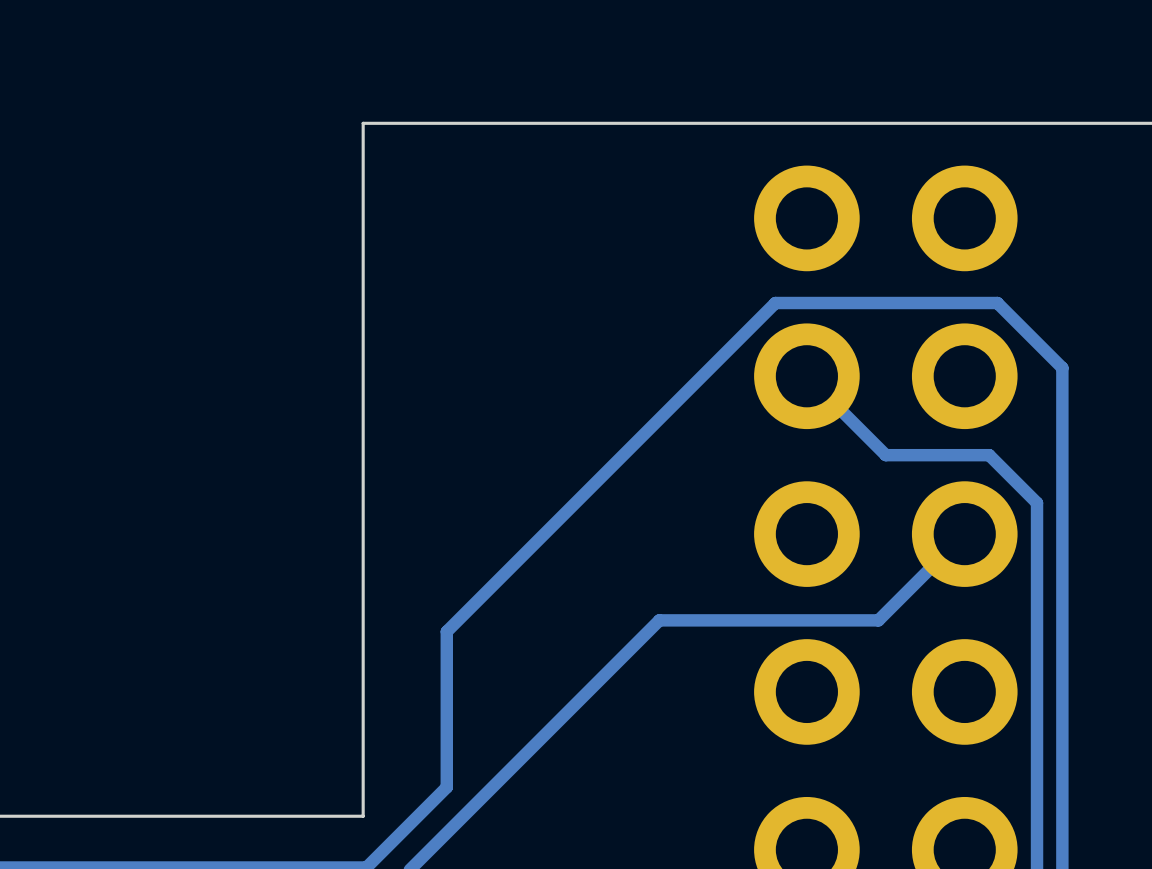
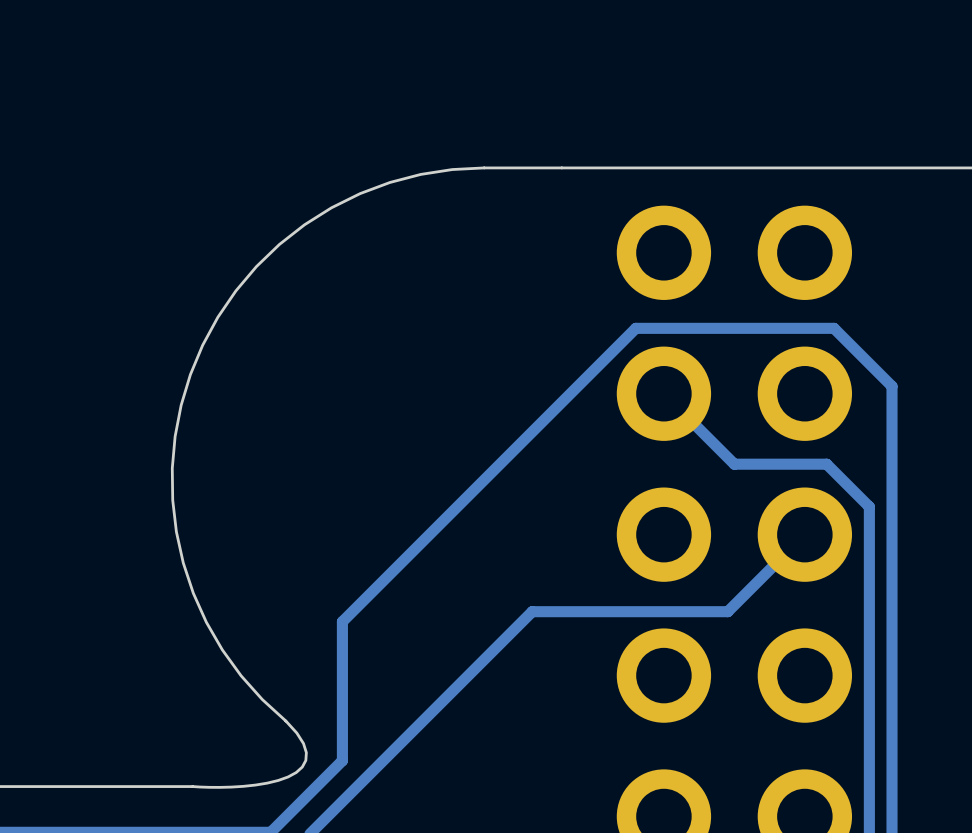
board edge: (692, 123) (363, 123) (363, 816) (279, 816) -> (561, 167) (452, 169) (420, 174) (389, 182) (360, 193) (331, 207) (304, 224) (279, 244) (256, 266) (235, 290) (217, 317) (202, 345) (190, 374) (181, 405) (175, 436) (172, 468) (172, 500) (176, 531) (183, 562) (193, 593) (206, 622) (222, 649) (241, 675) (262, 699) (296, 733) (306, 752) (305, 760) (302, 767) (296, 772) (278, 780) (243, 786) (192, 786)

